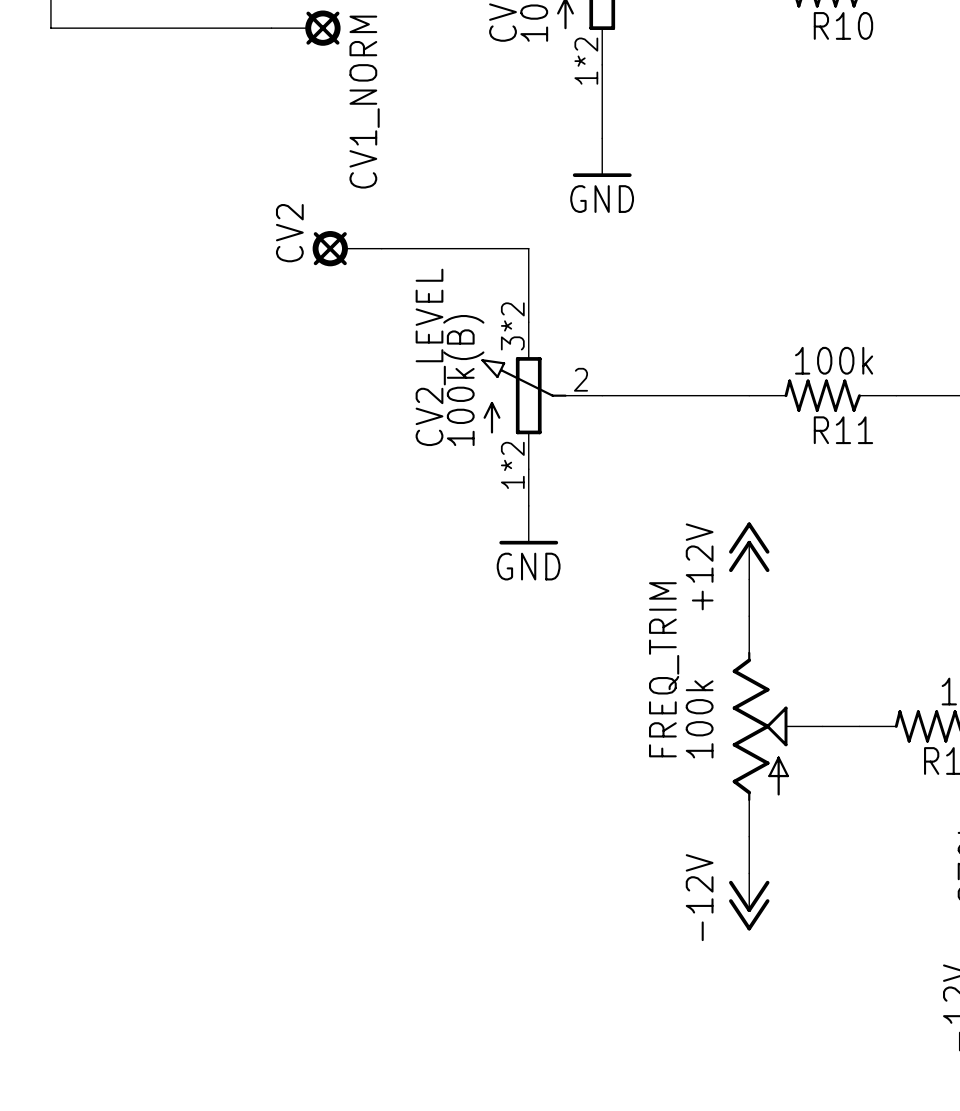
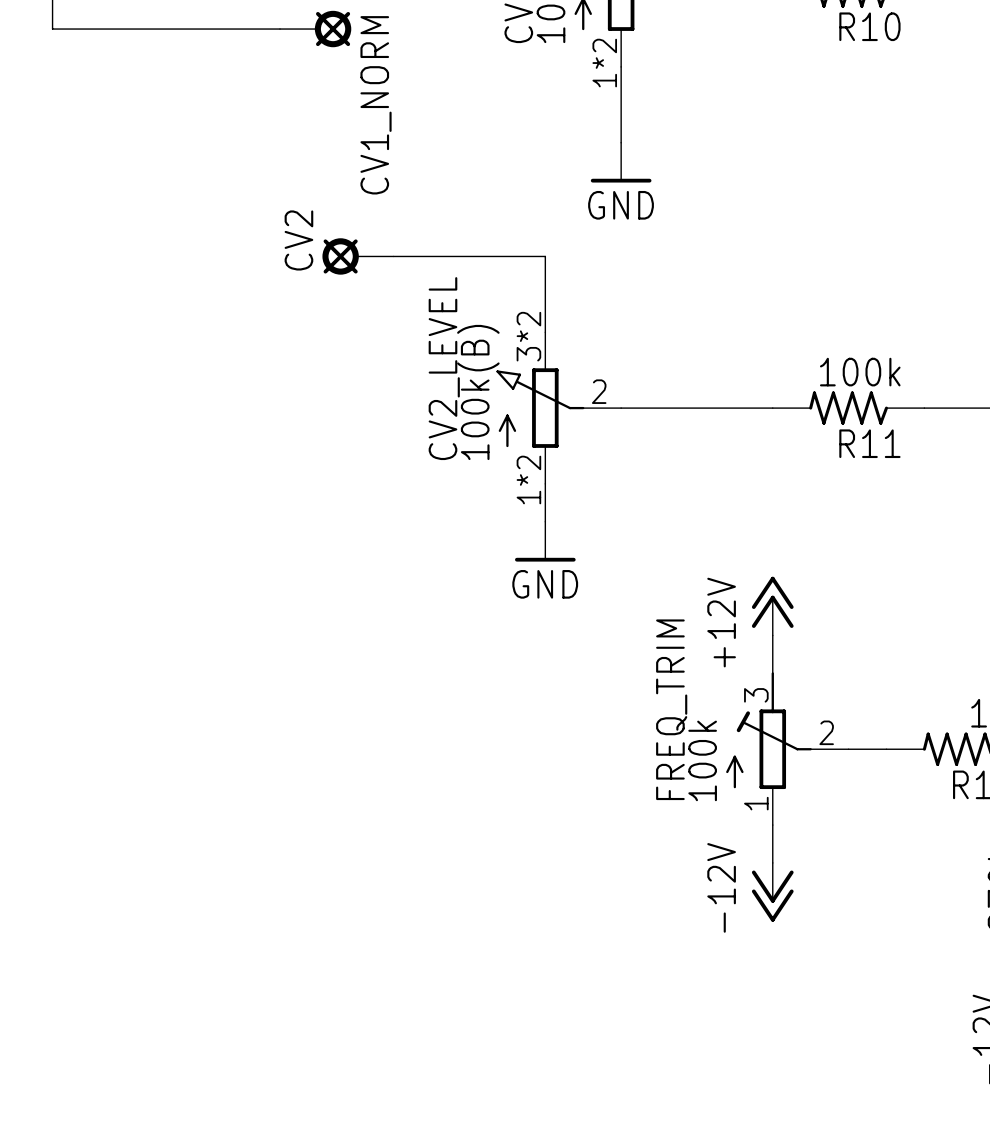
power symbol position: +12V (749, 550) -> +12V (772, 606)
FREQ_TRIM symbol: [732, 616, 823, 837] -> [726, 672, 849, 826]
power symbol position: -12V (749, 901) -> -12V (772, 892)

